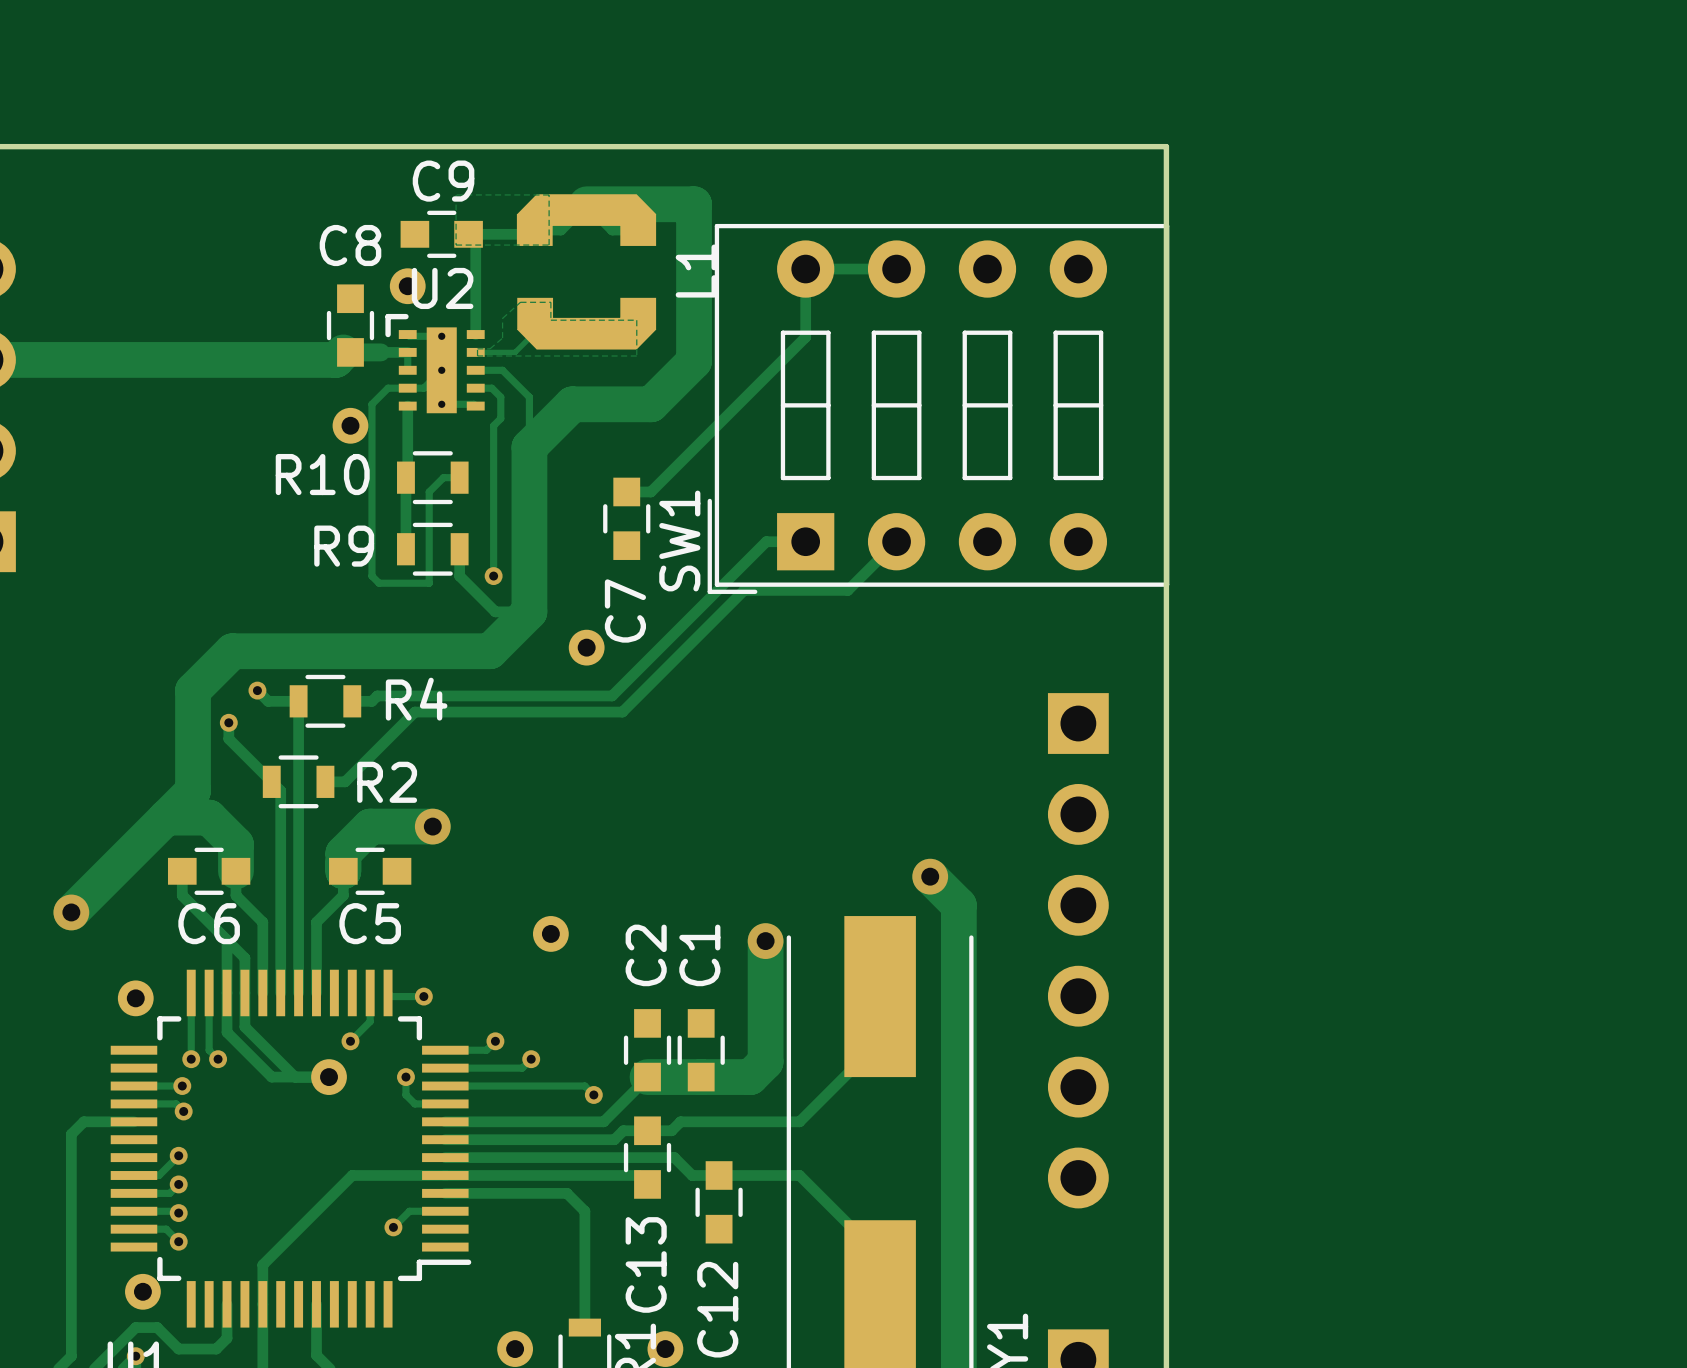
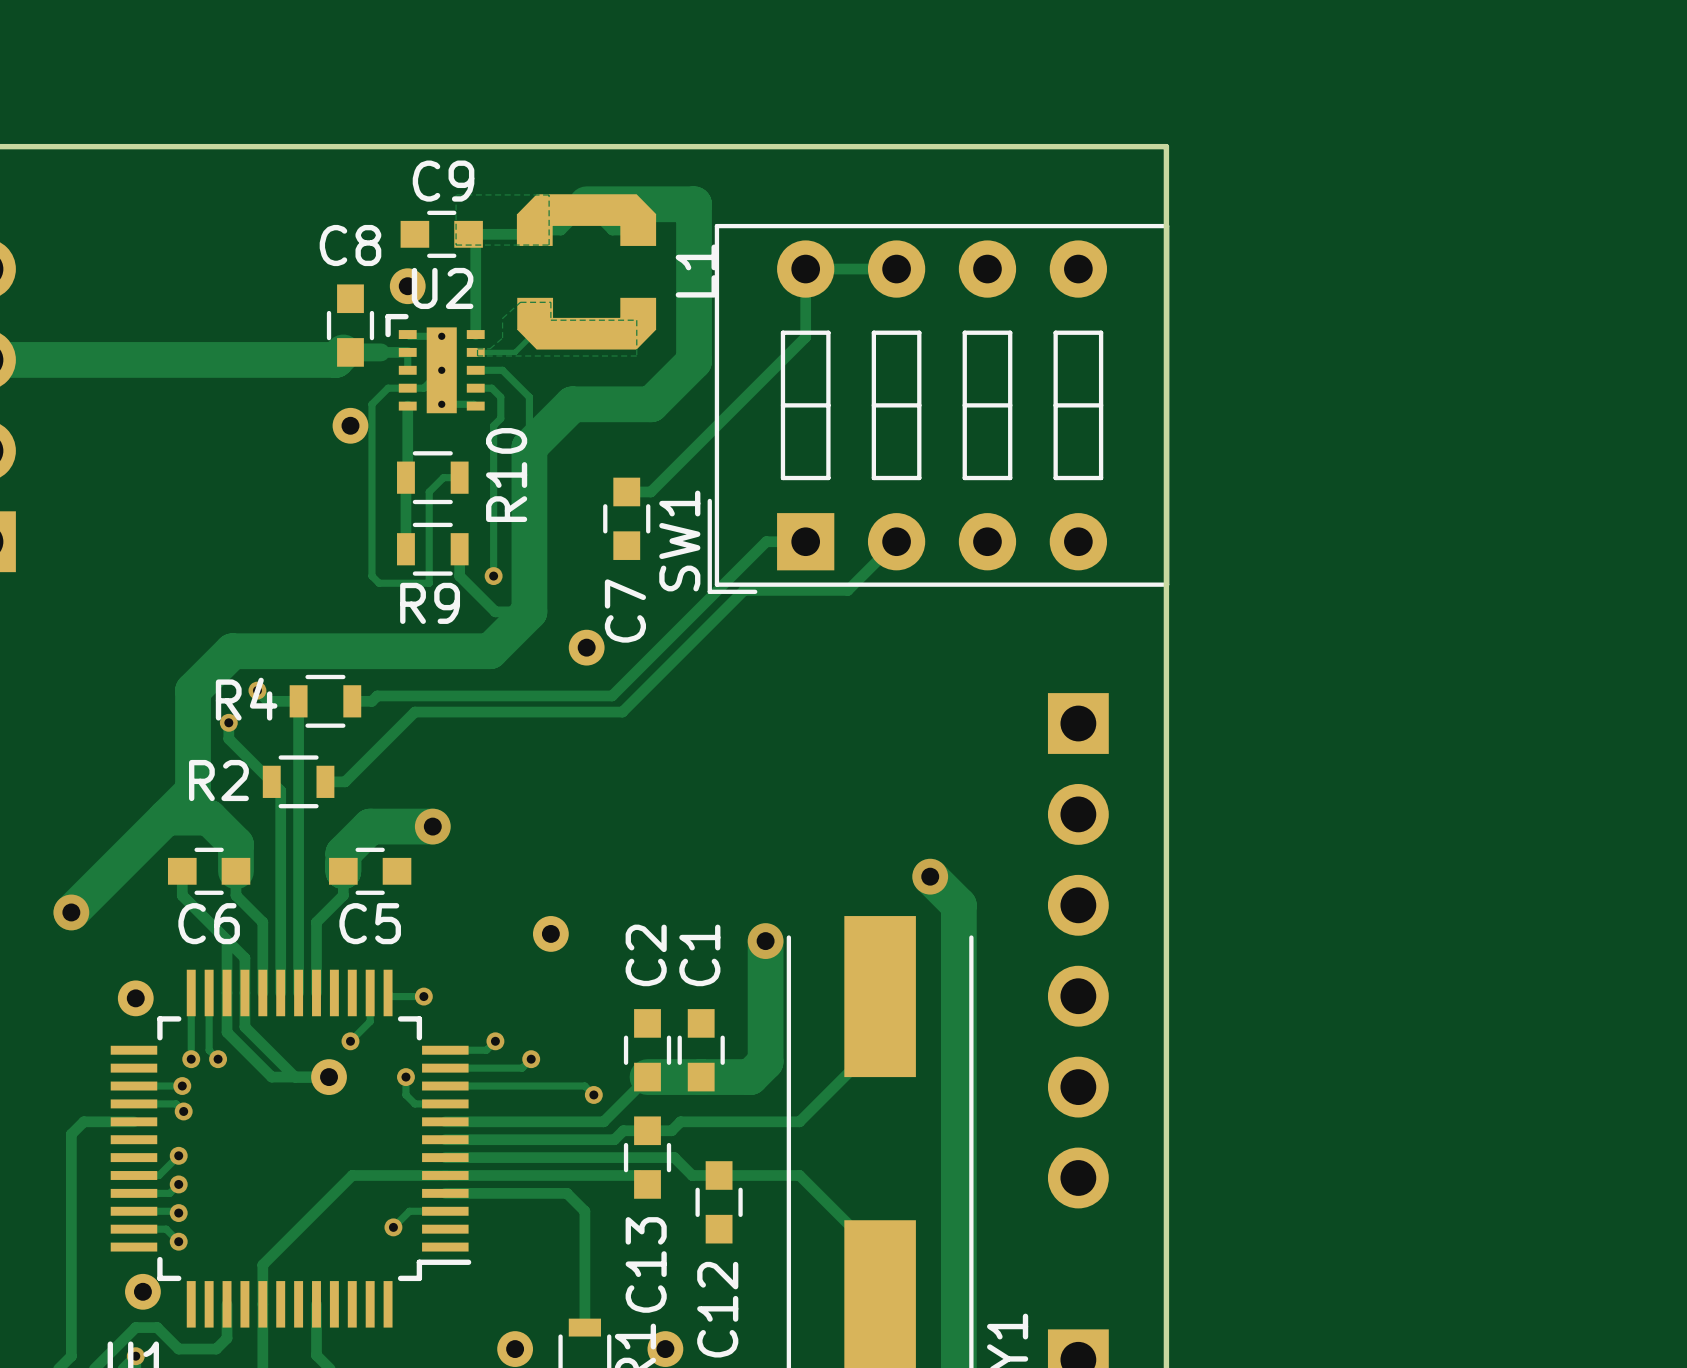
R10 name rotation: 0° (322, 474) -> 90° counterclockwise (506, 475)
R10 name position: R10 (322, 474) -> R10 (506, 475)
R9 name position: R9 (344, 546) -> R9 (430, 603)
R4 name position: R4 (416, 699) -> R4 (246, 699)
R2 name position: R2 (387, 782) -> R2 (218, 780)

